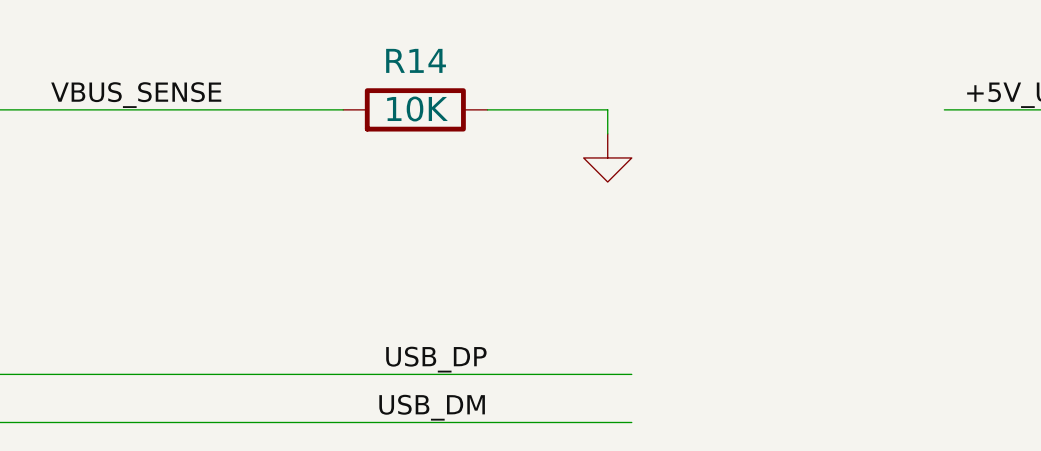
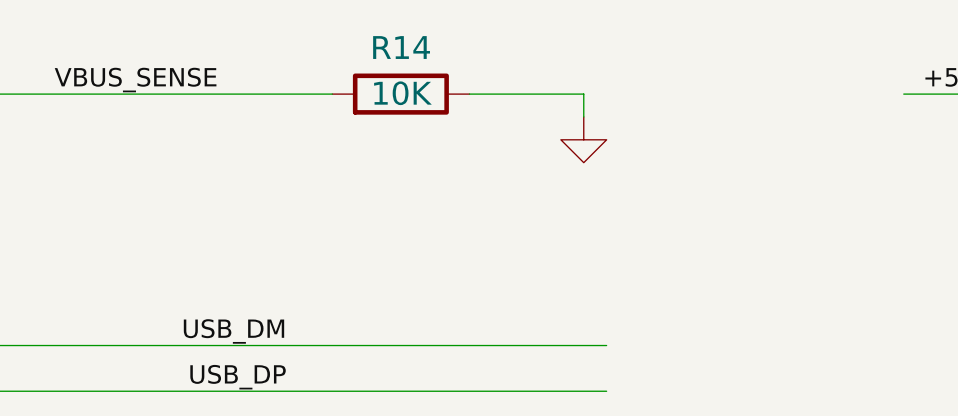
label position: USB_DP (436, 359) -> USB_DP (238, 377)
label position: USB_DM (432, 407) -> USB_DM (233, 331)

